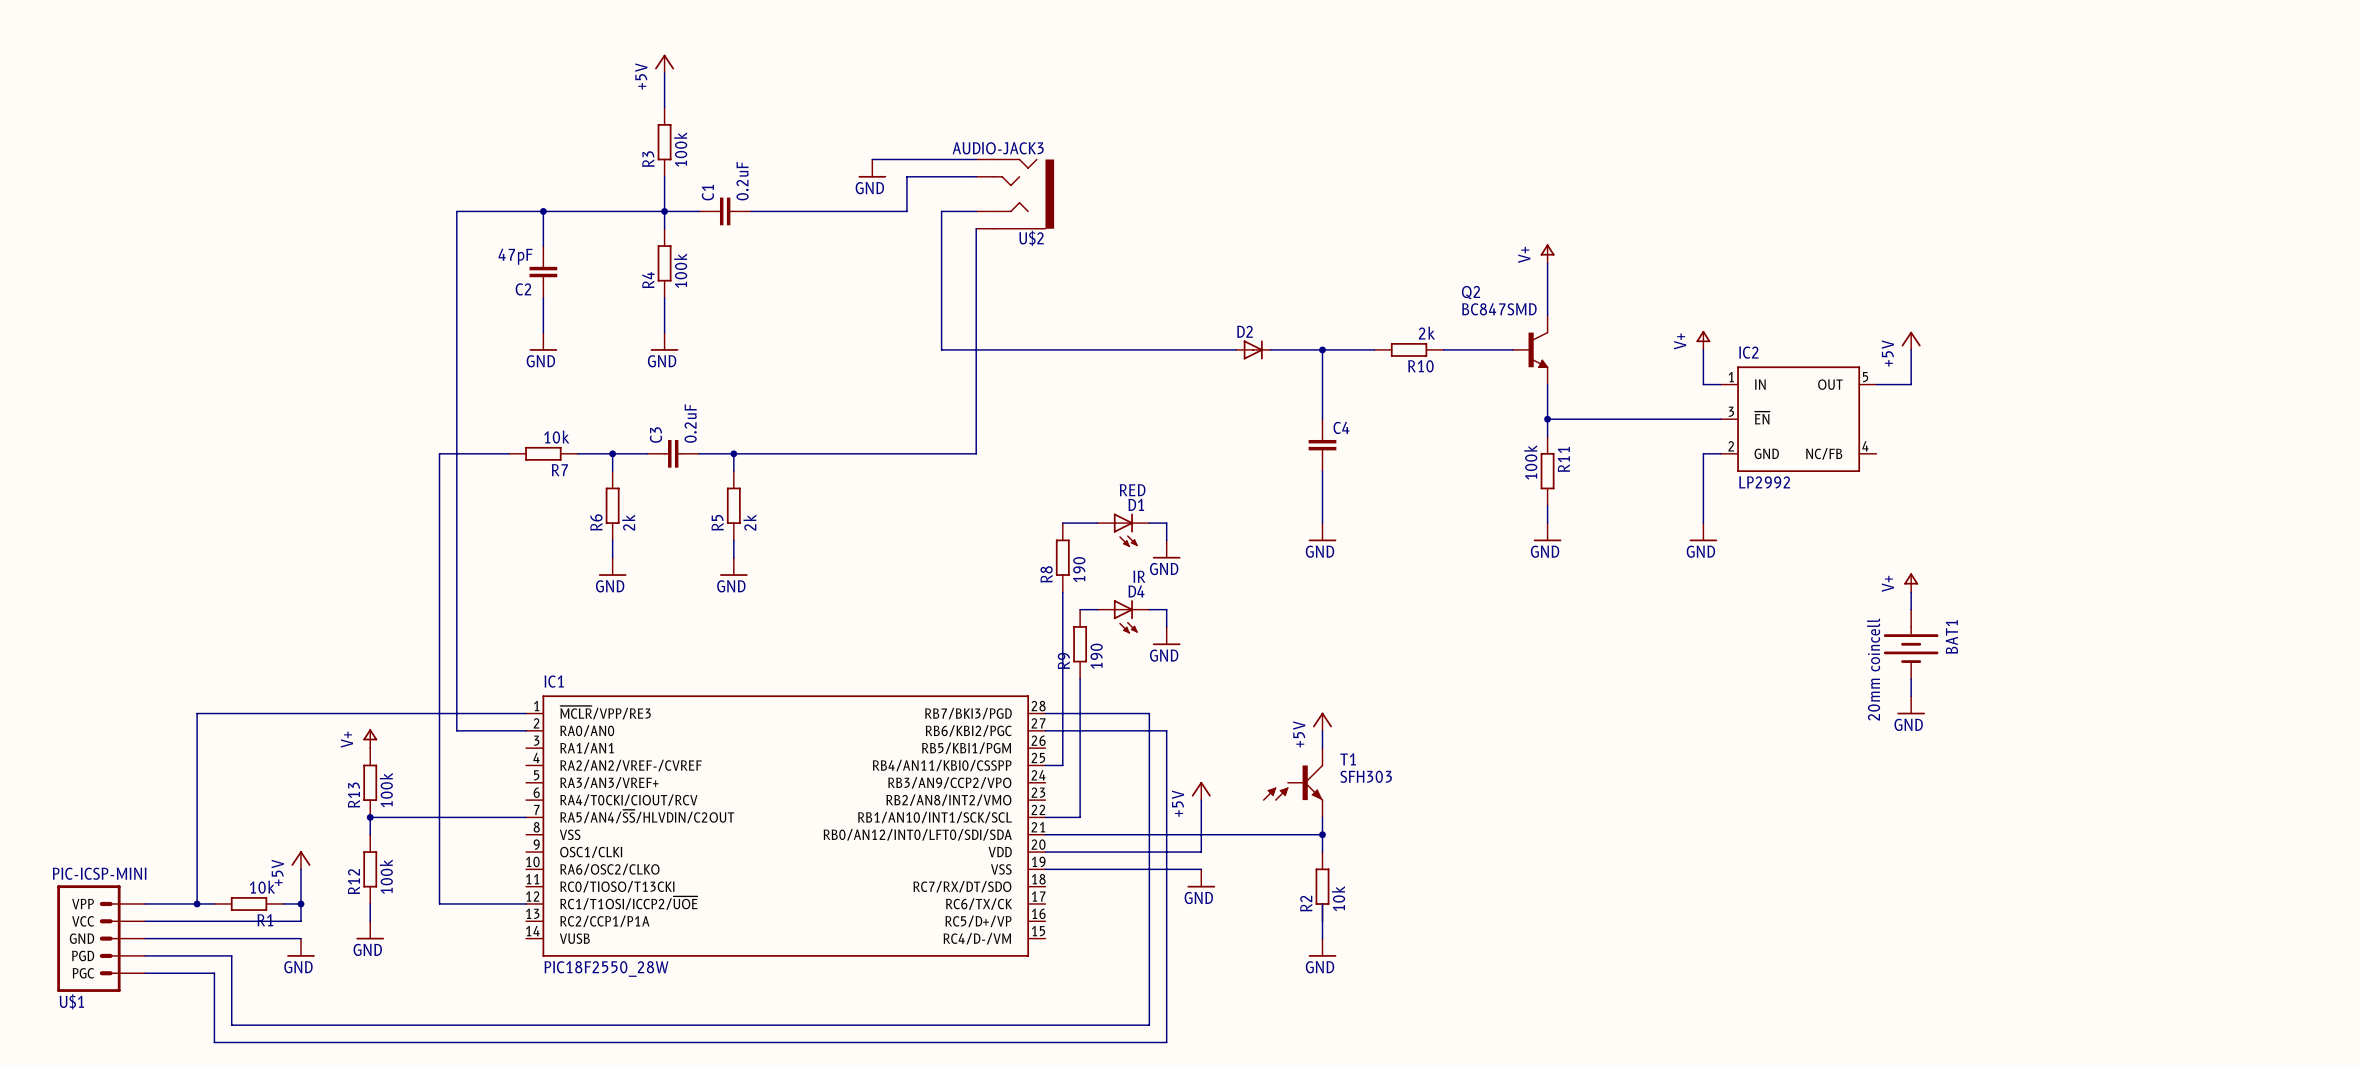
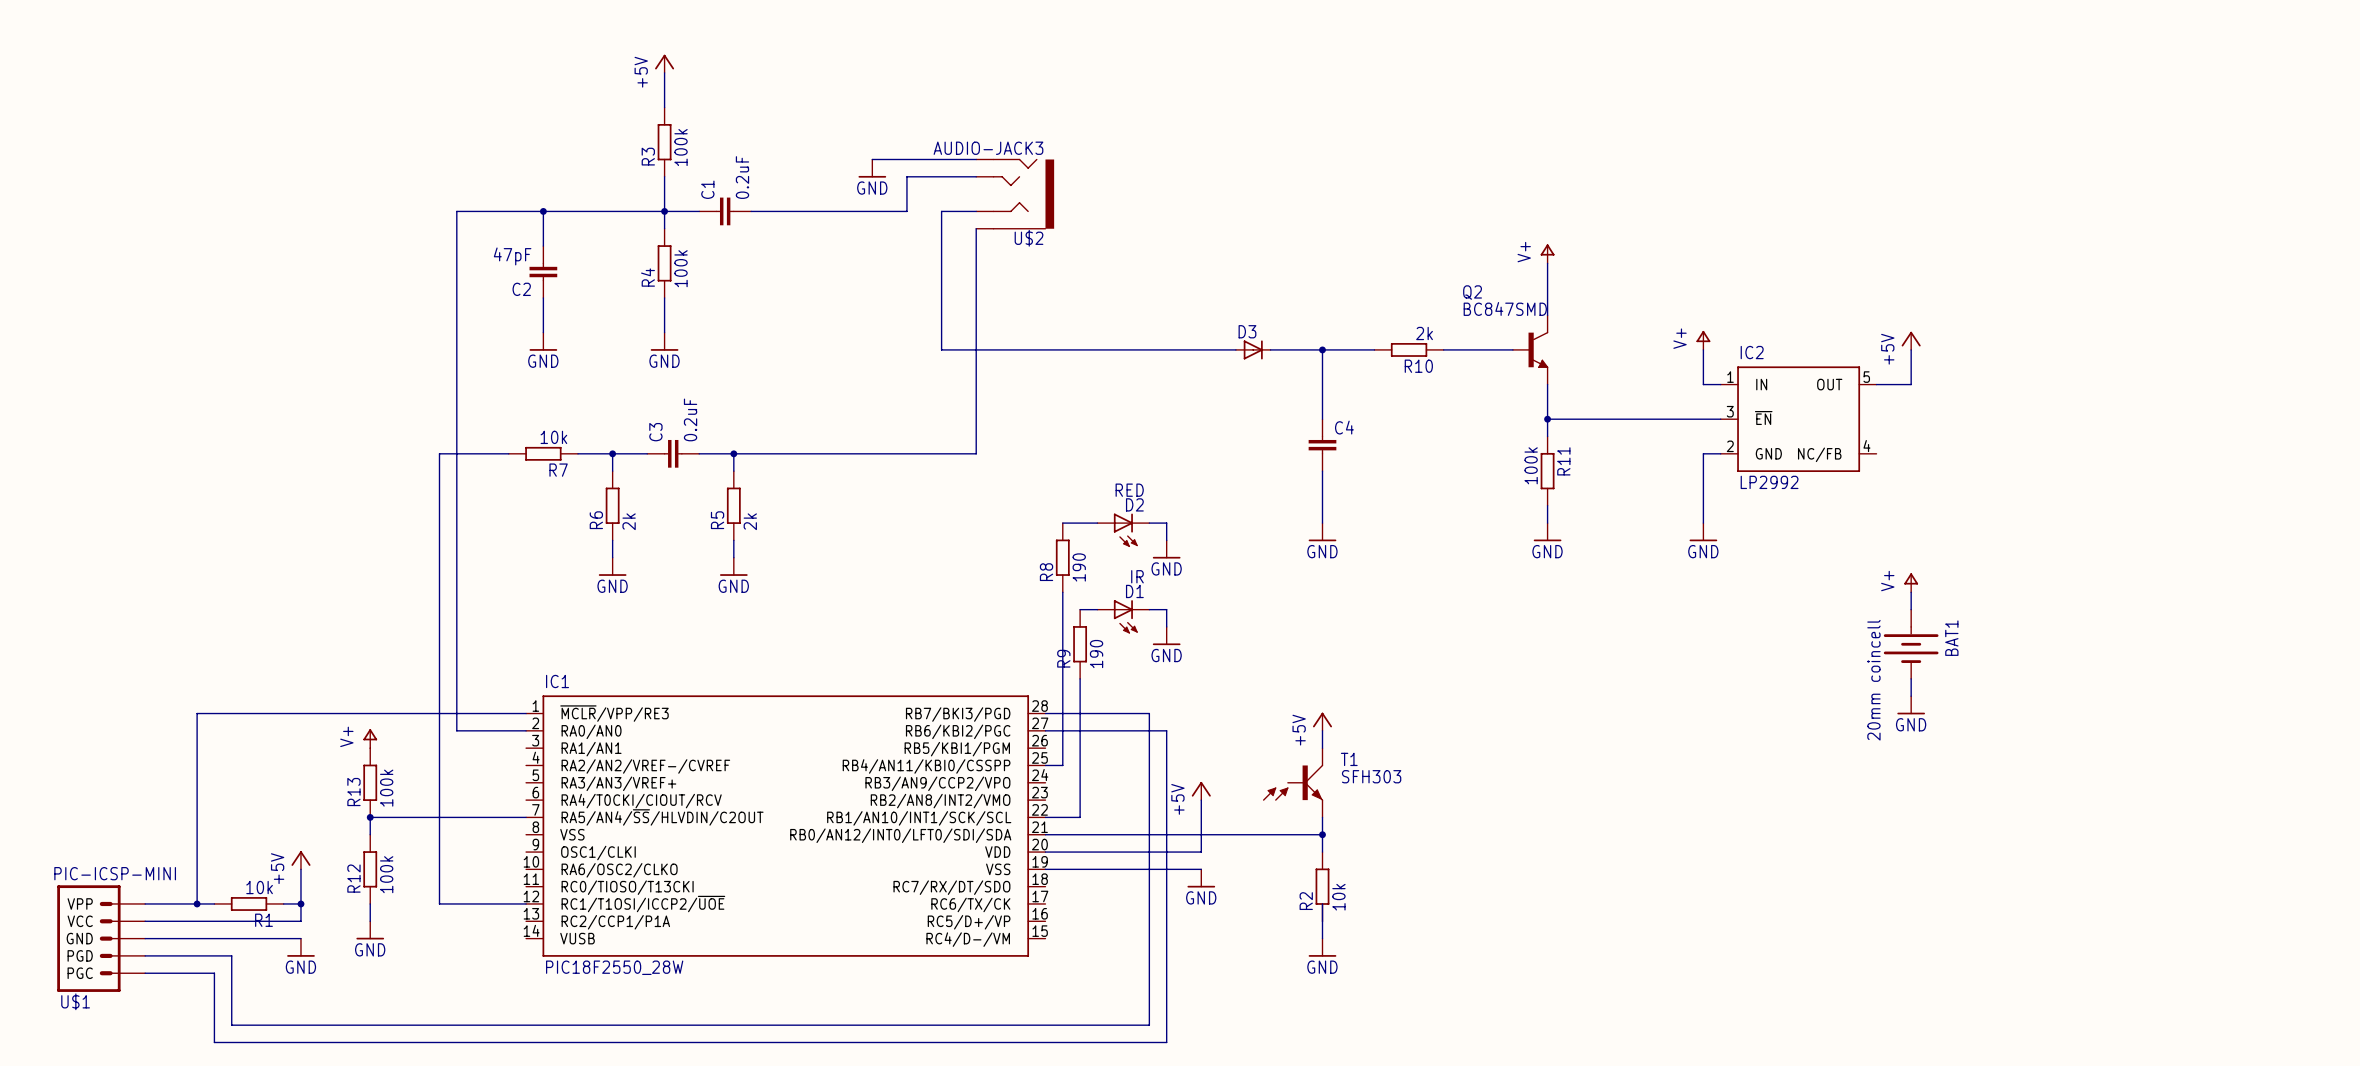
D2 name: D2 (1244, 331) -> D3 (1247, 331)
D1 name: D1 (1136, 504) -> D2 (1134, 504)
D4 name: D4 (1136, 591) -> D1 (1134, 591)

